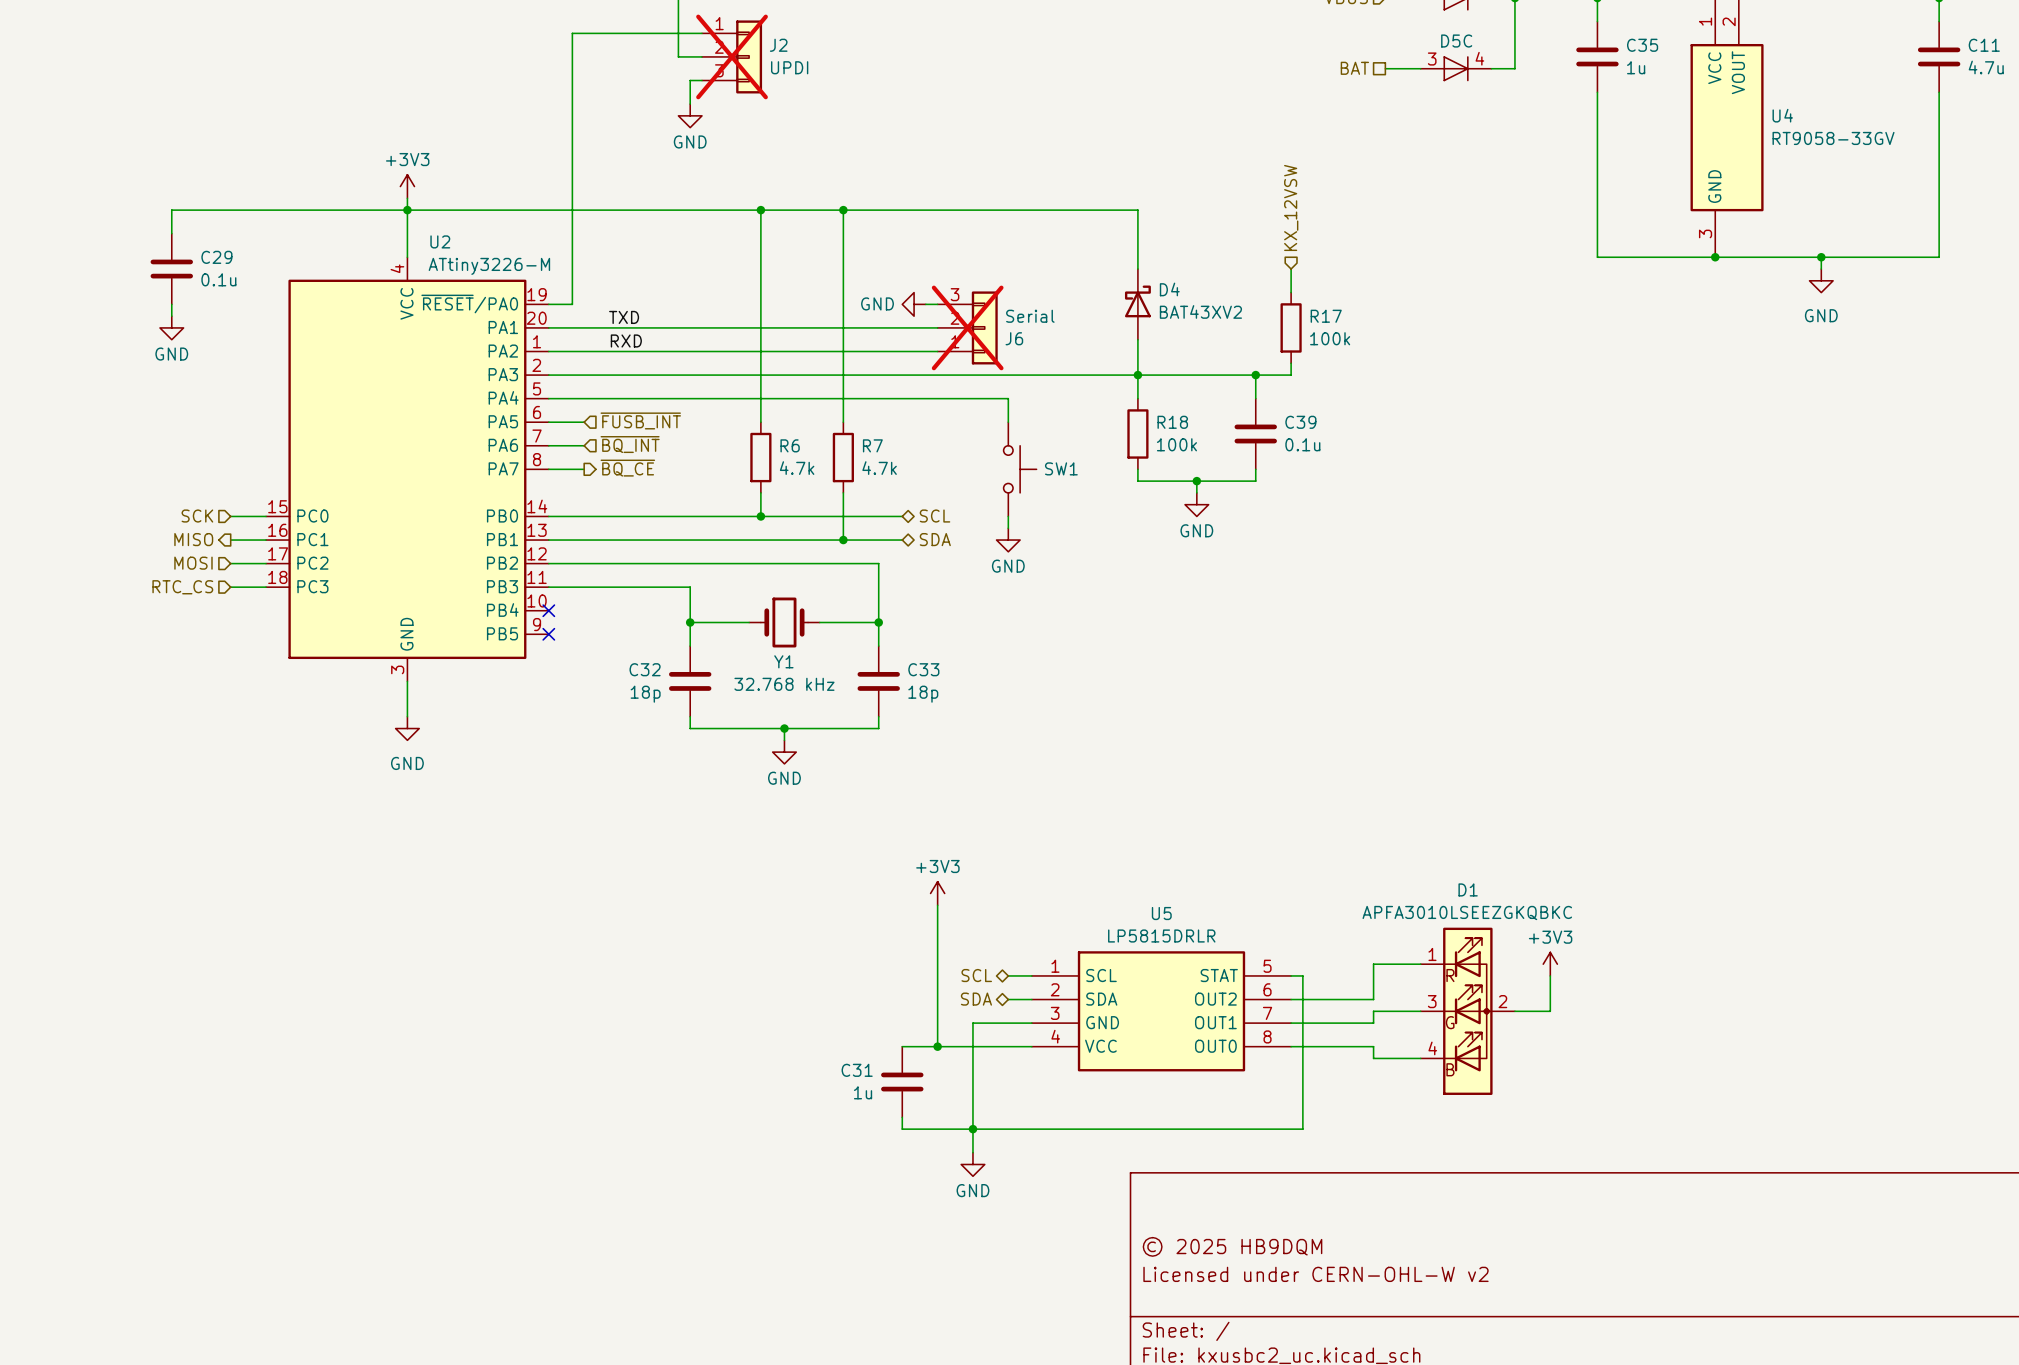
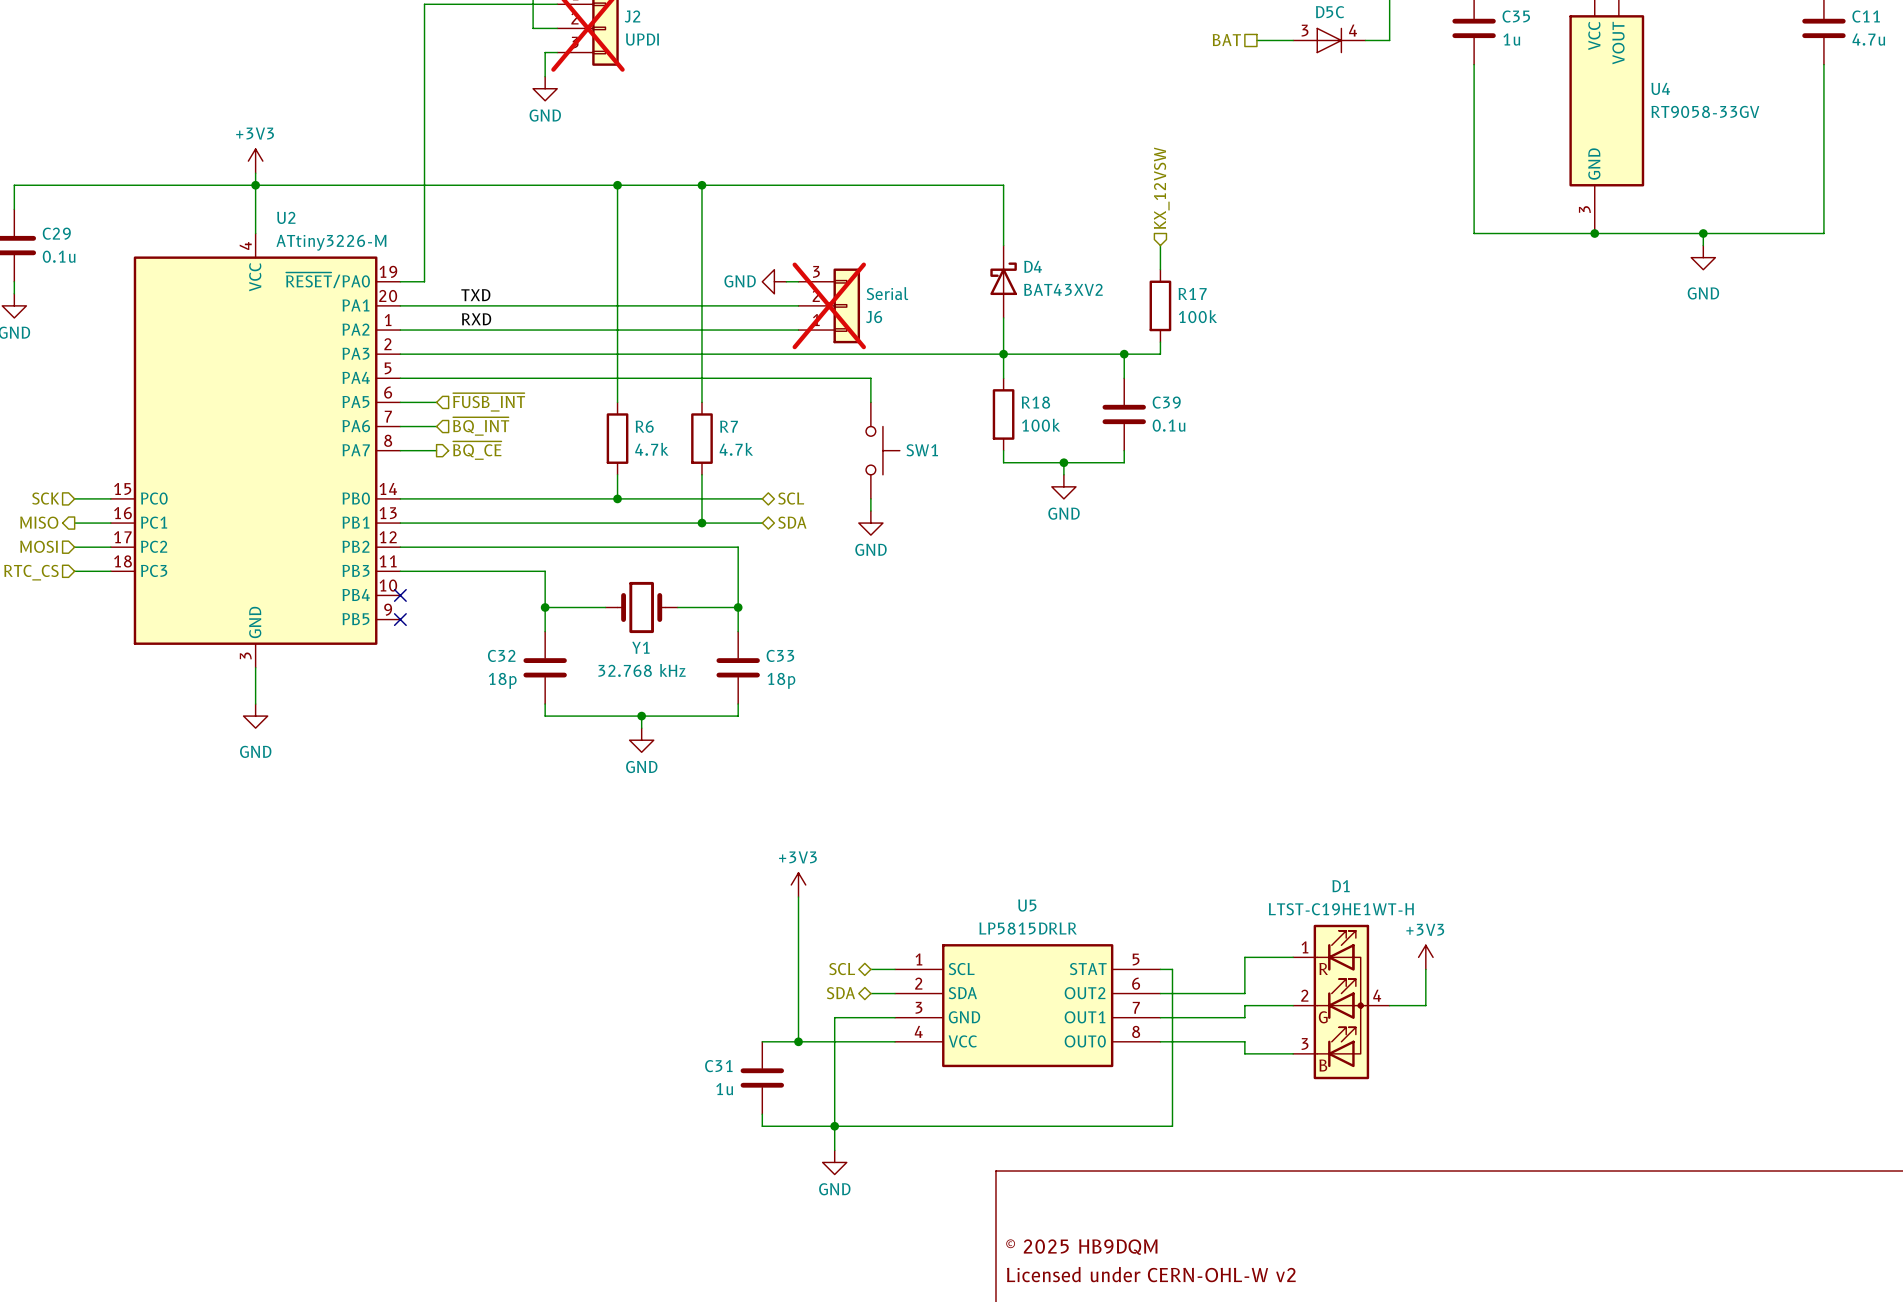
D1 value: APFA3010LSEEZGKQBKC (1467, 913) -> LTST-C19HE1WT-H (1341, 909)
D1 symbol: [1420, 927, 1515, 1095] -> [1293, 924, 1390, 1080]

